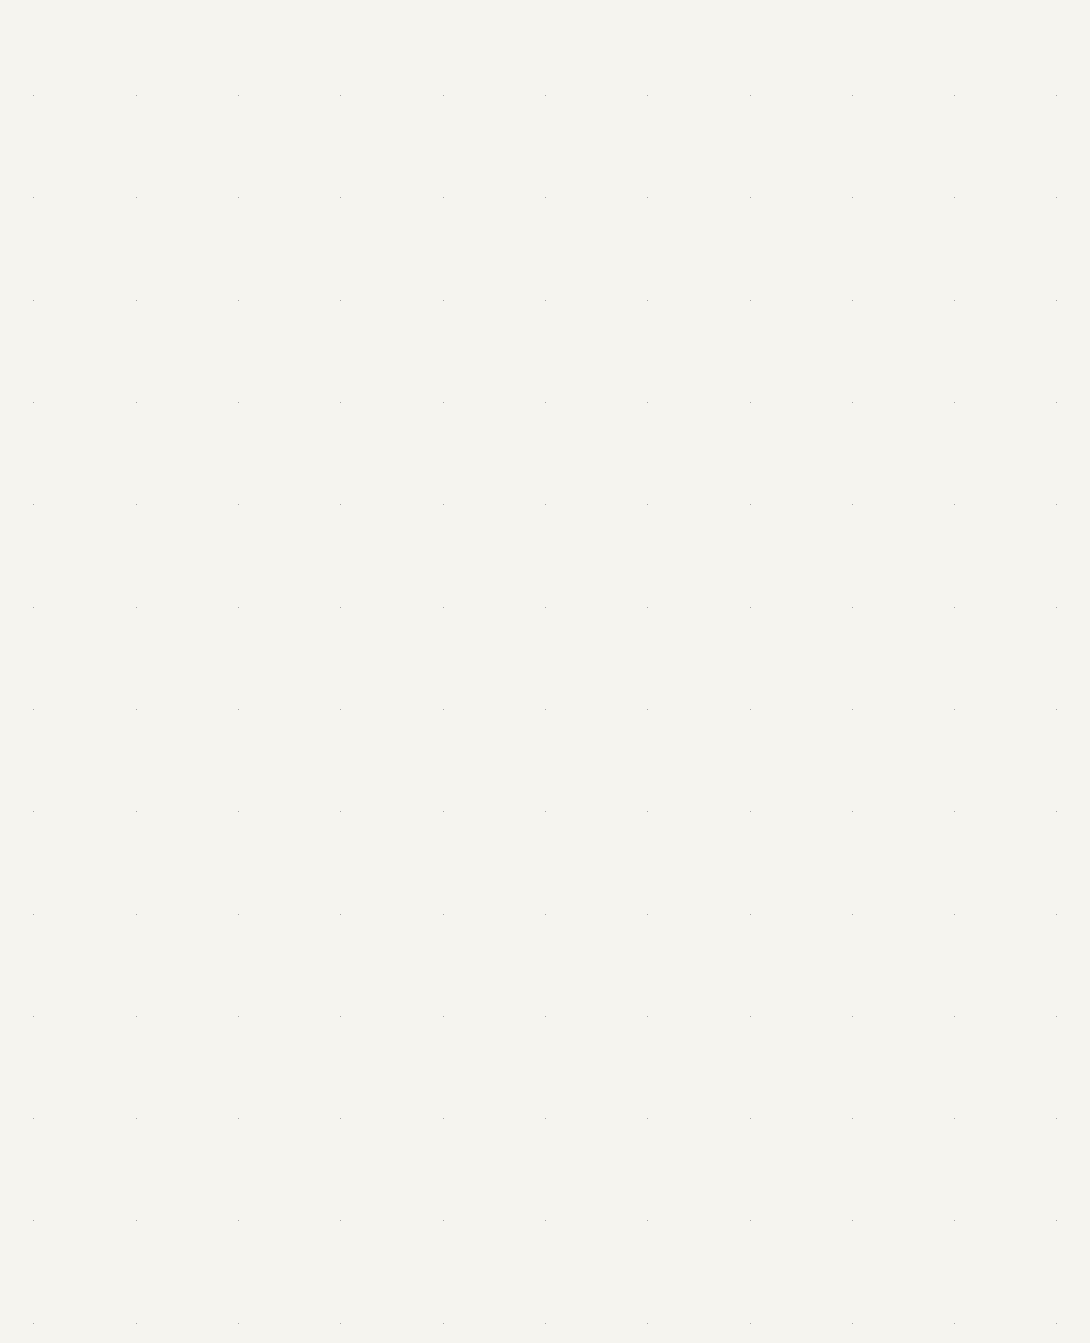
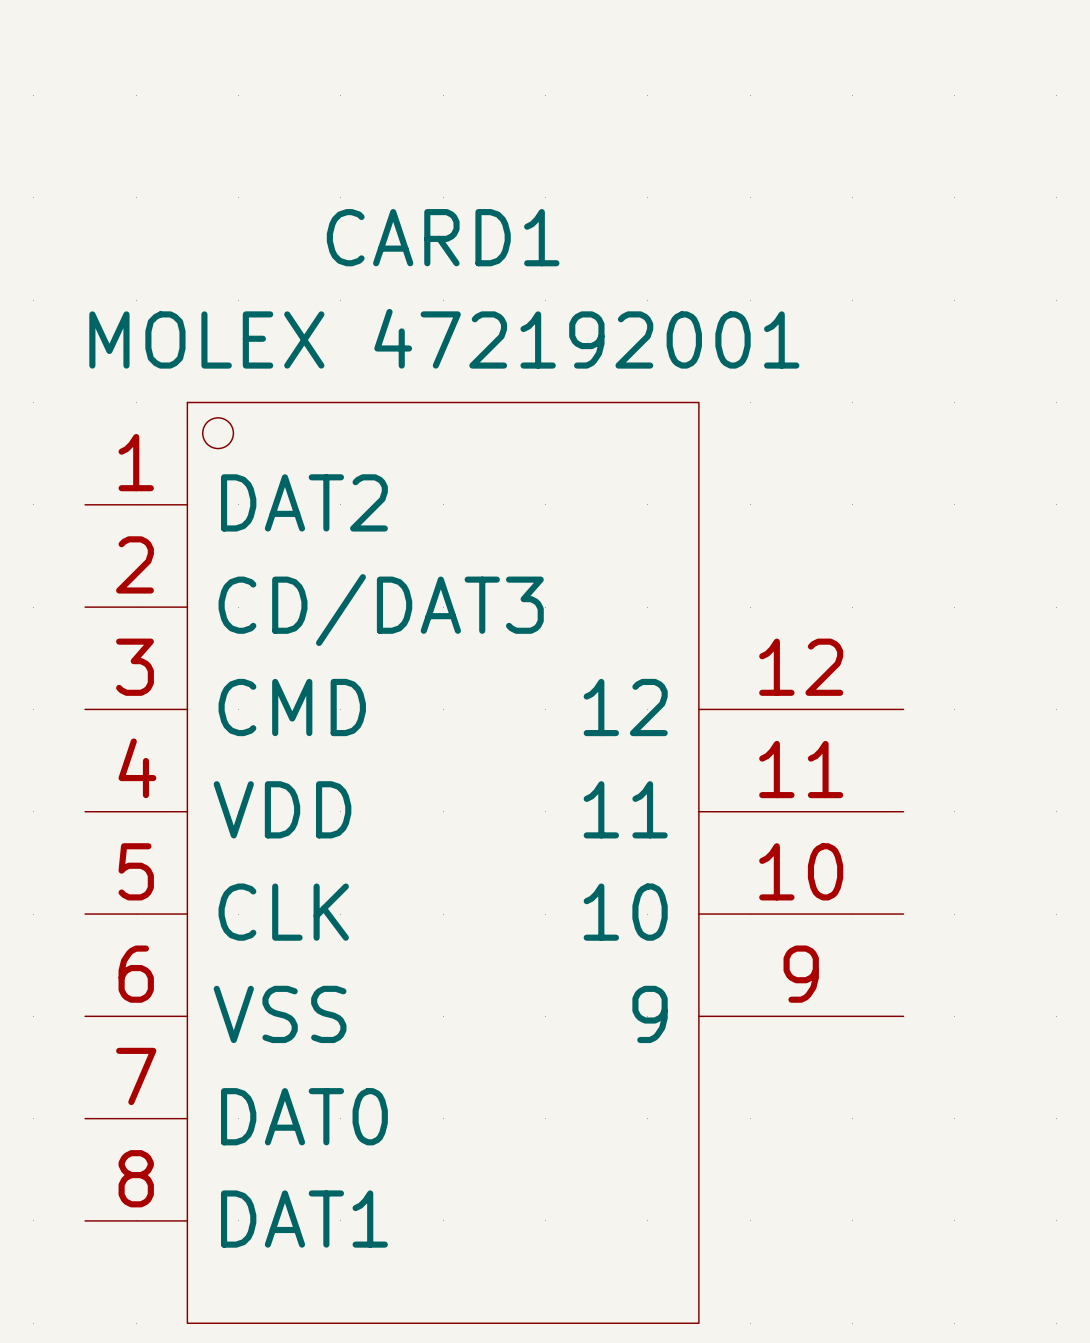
CARD1: none -> MOLEX 472192001 (494, 862)

